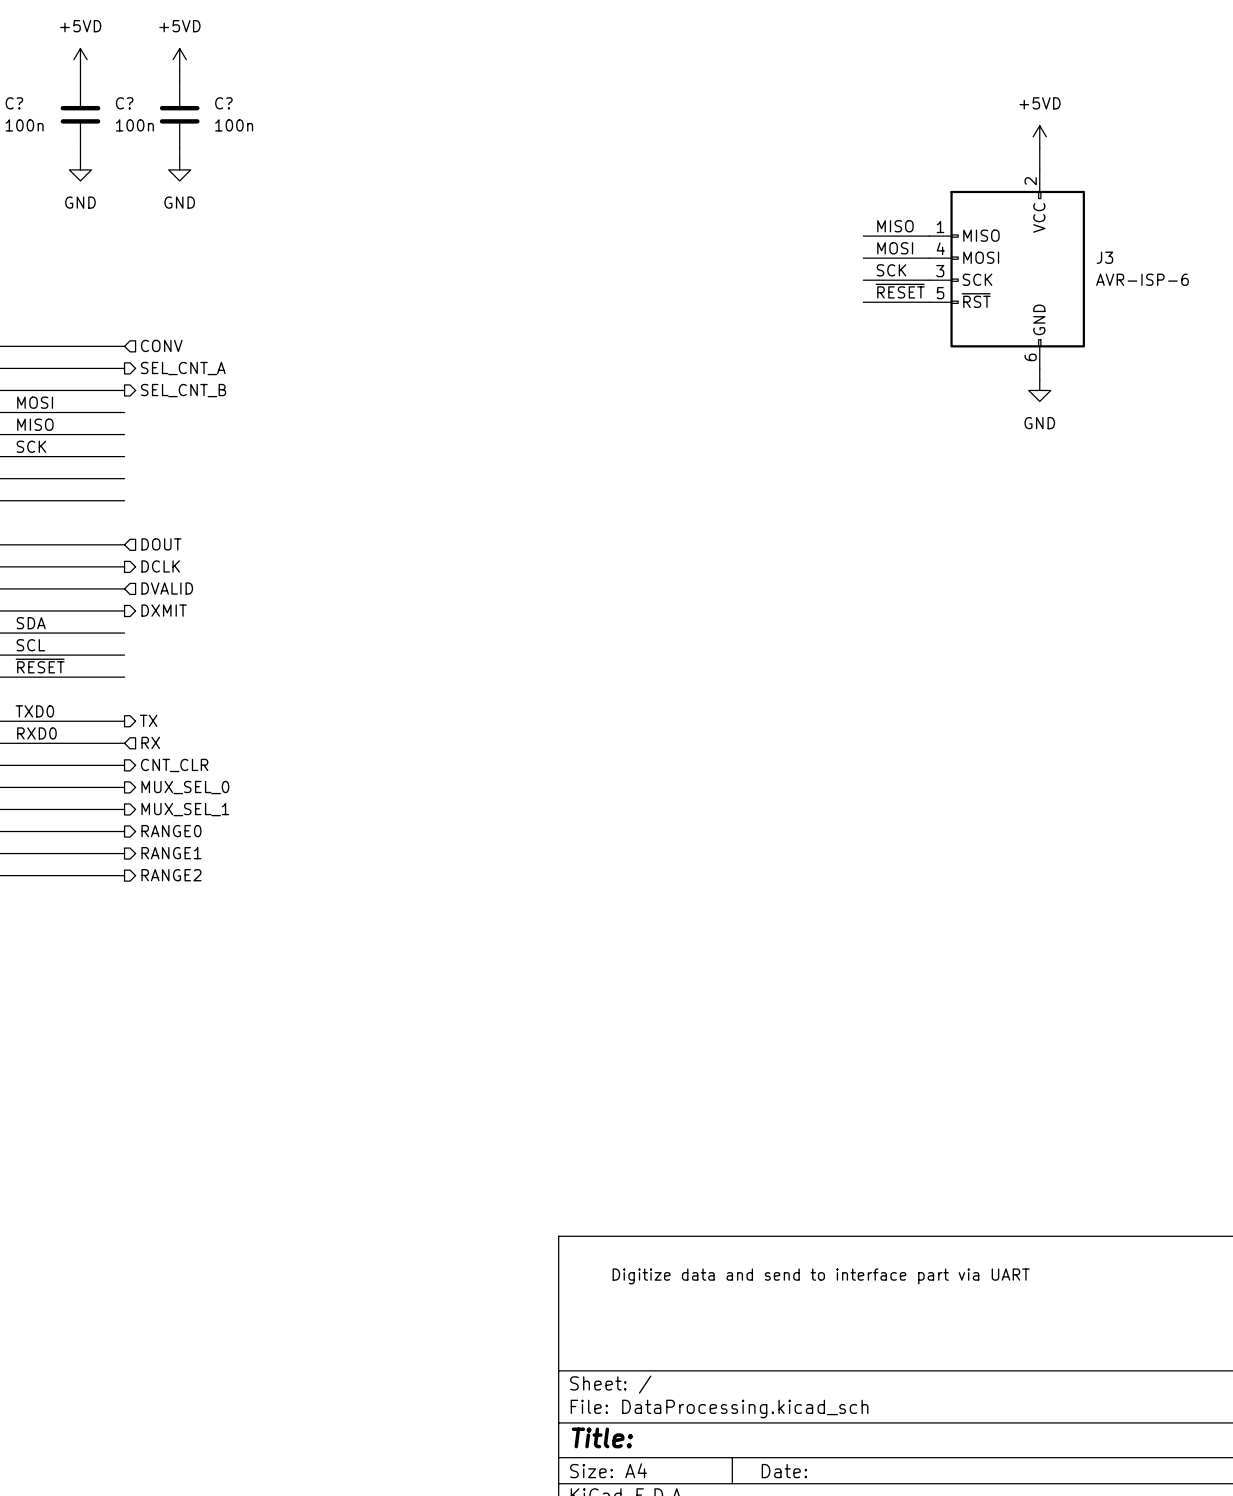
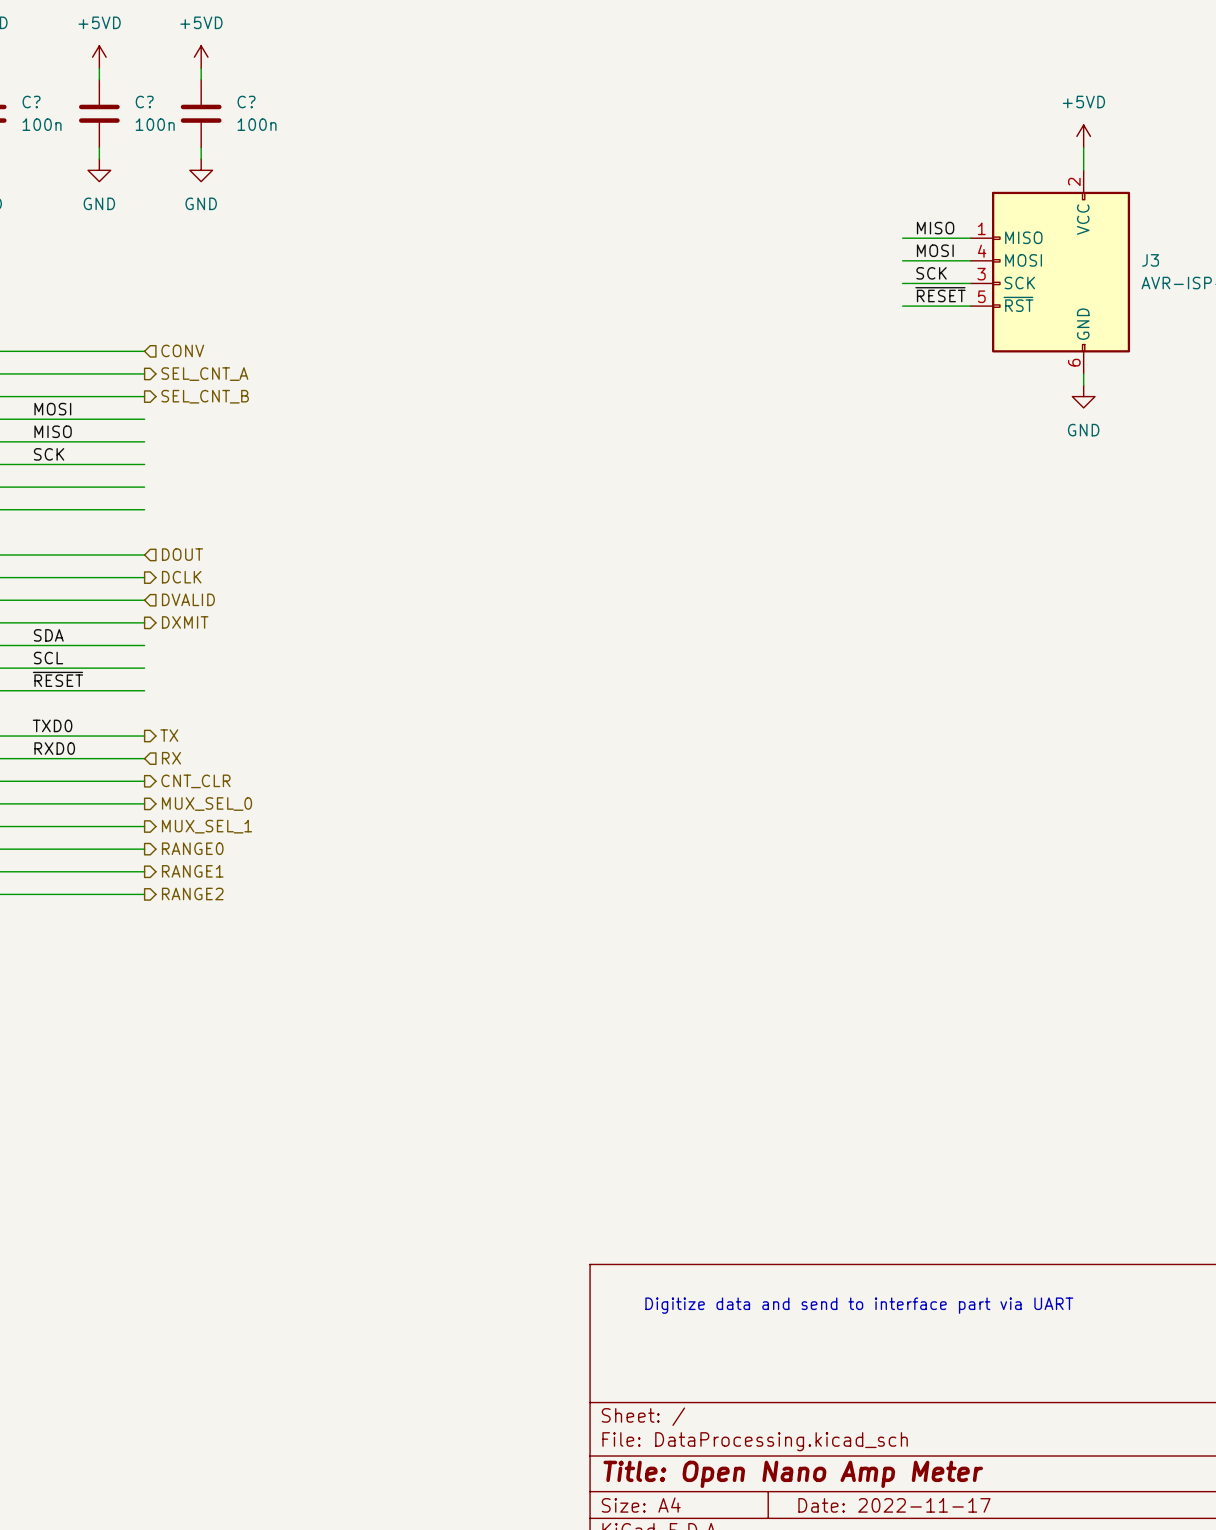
title block: Title: (602, 1437) -> Title: Open Nano Amp Meter (793, 1474)
title block: Date: (784, 1471) -> Date: 2022-11-17 (894, 1505)

